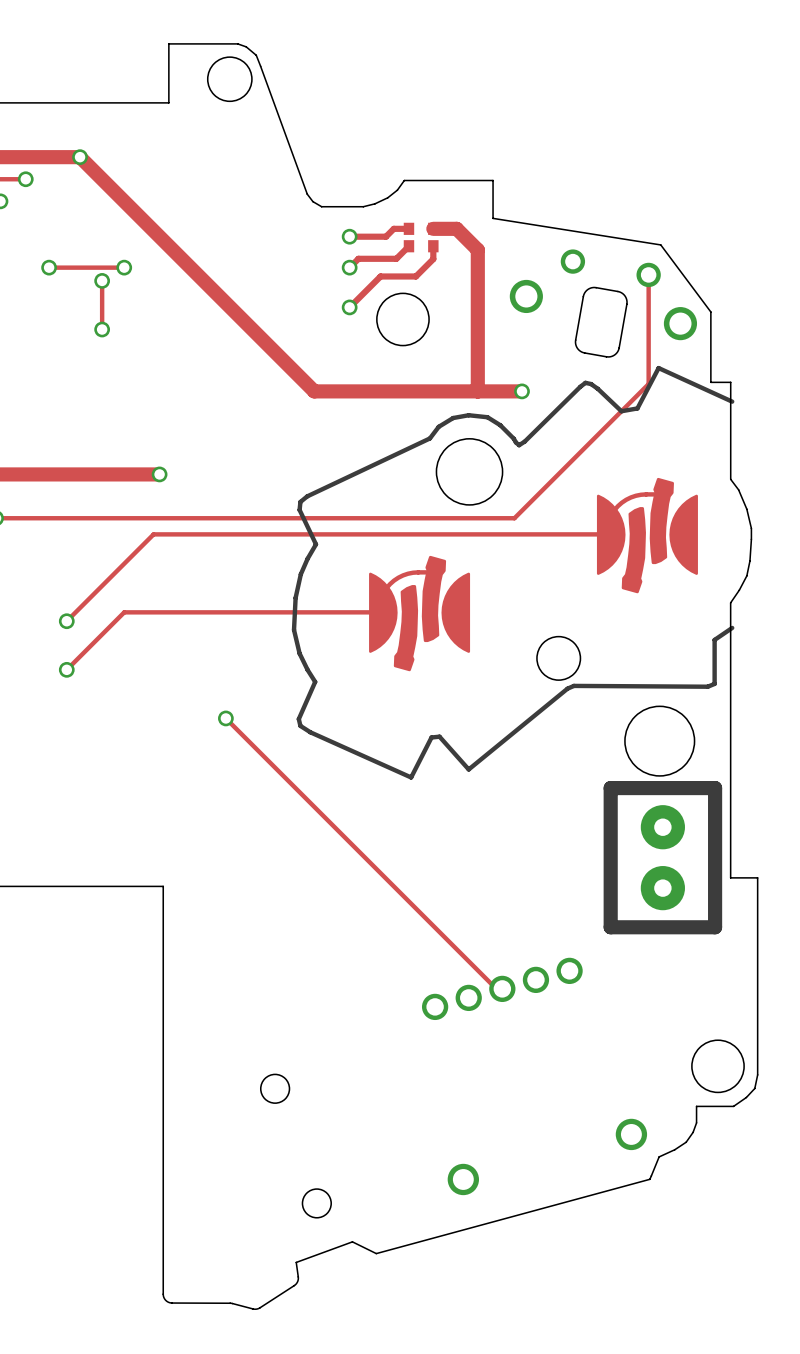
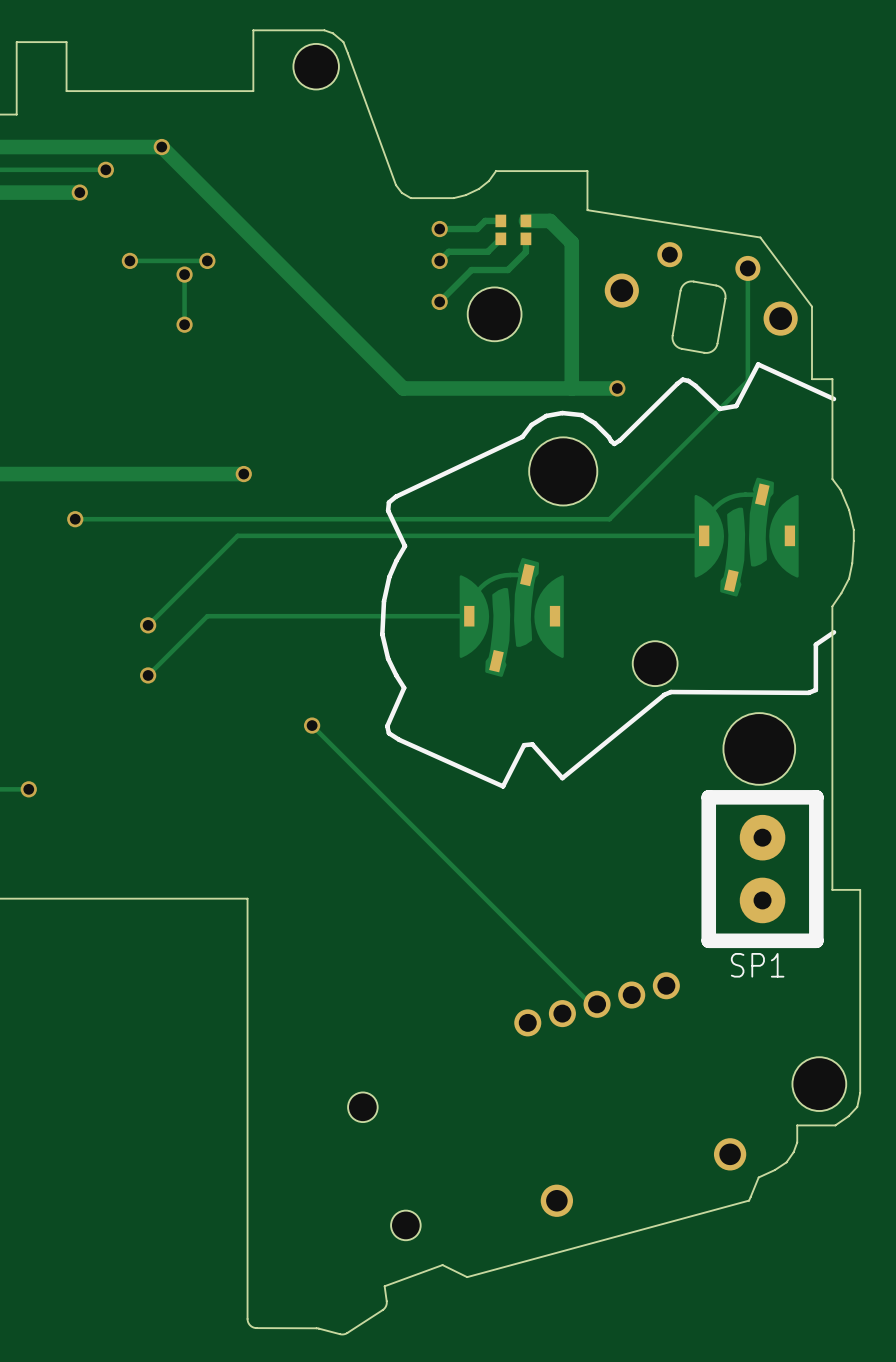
SP1 name: none -> SP1 (757, 965)

